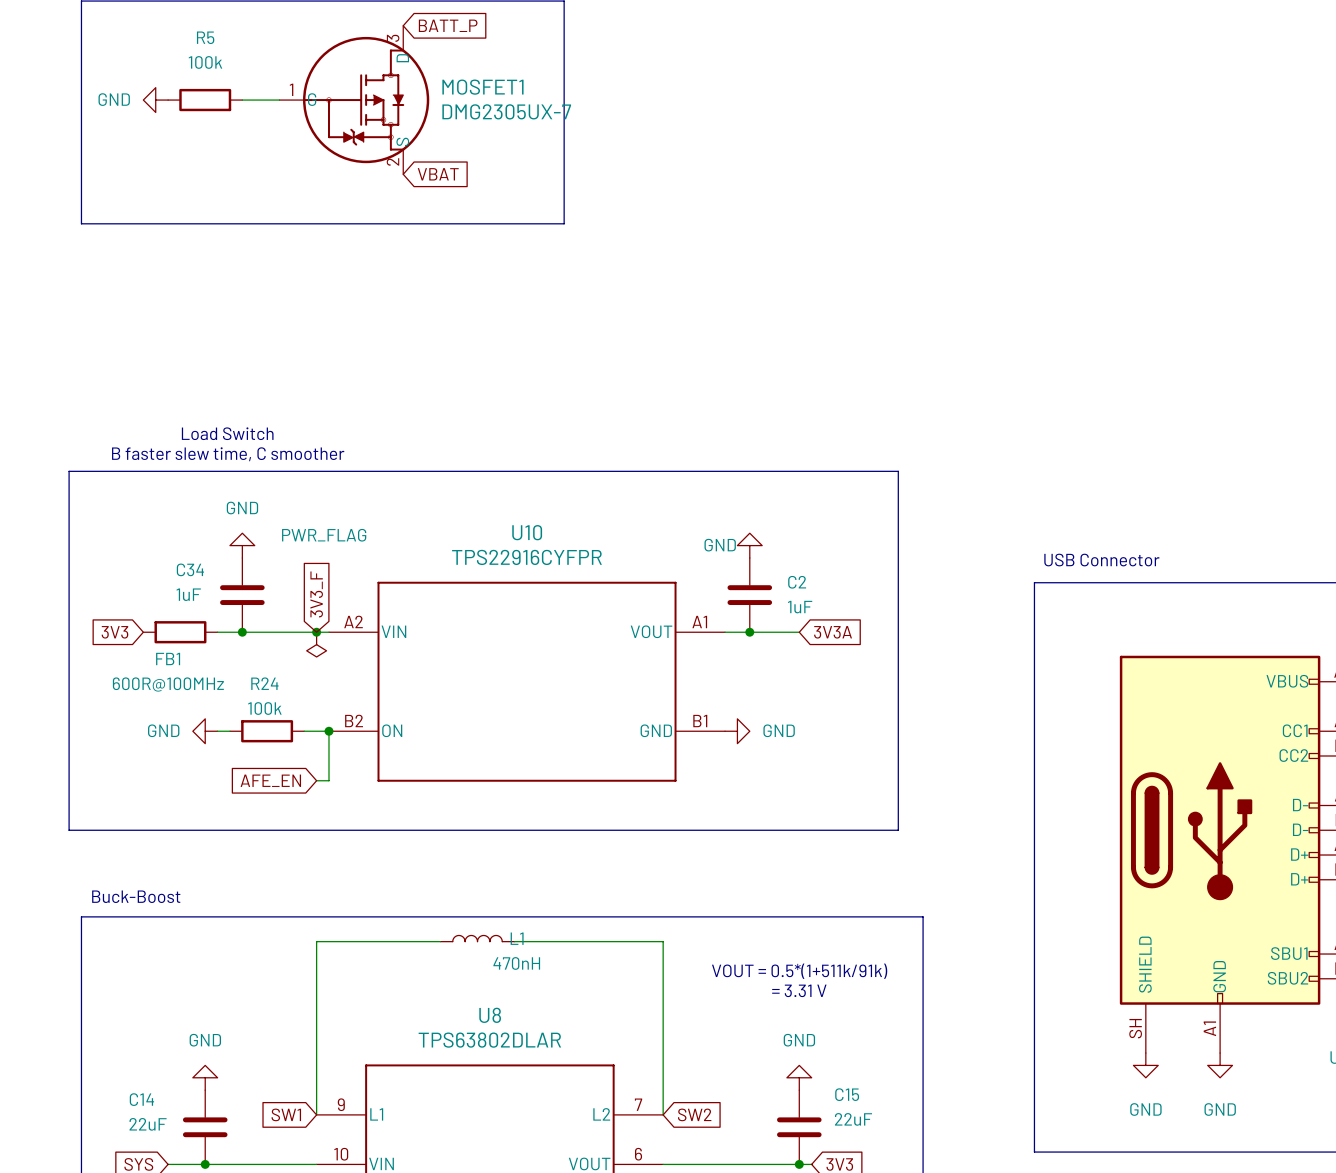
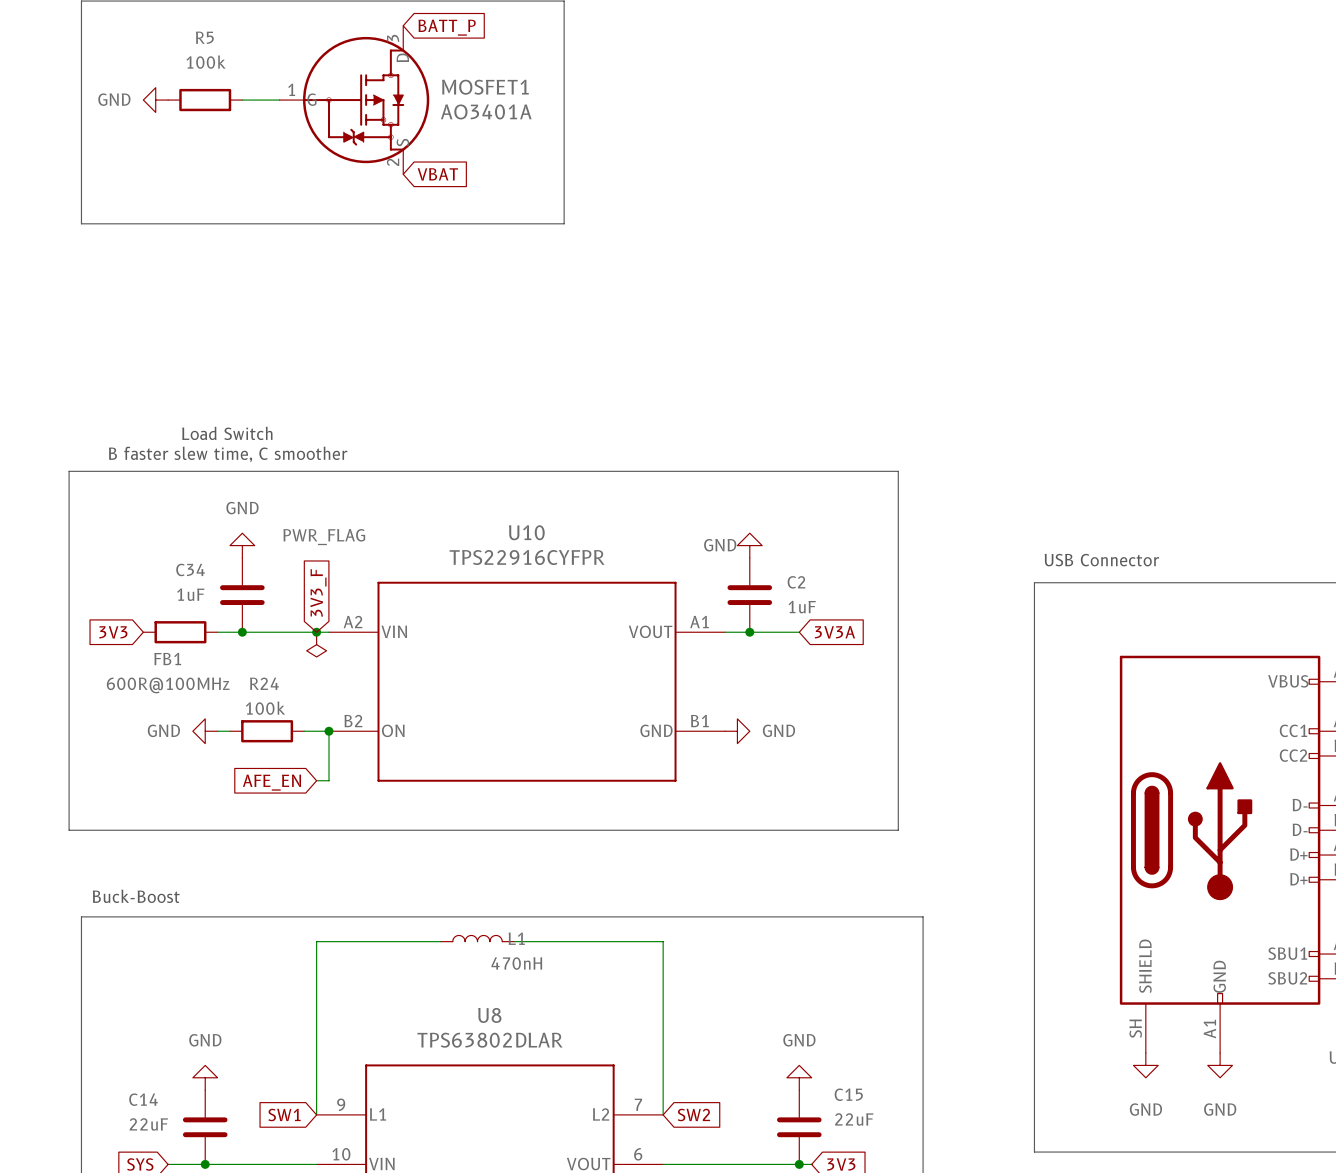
MOSFET1 value: DMG2305UX-7 (506, 111) -> AO3401A (486, 111)
text: VOUT = 0.5*(1+511k/91k) (799, 971) -> none
text: = 3.31 V (799, 990) -> none

